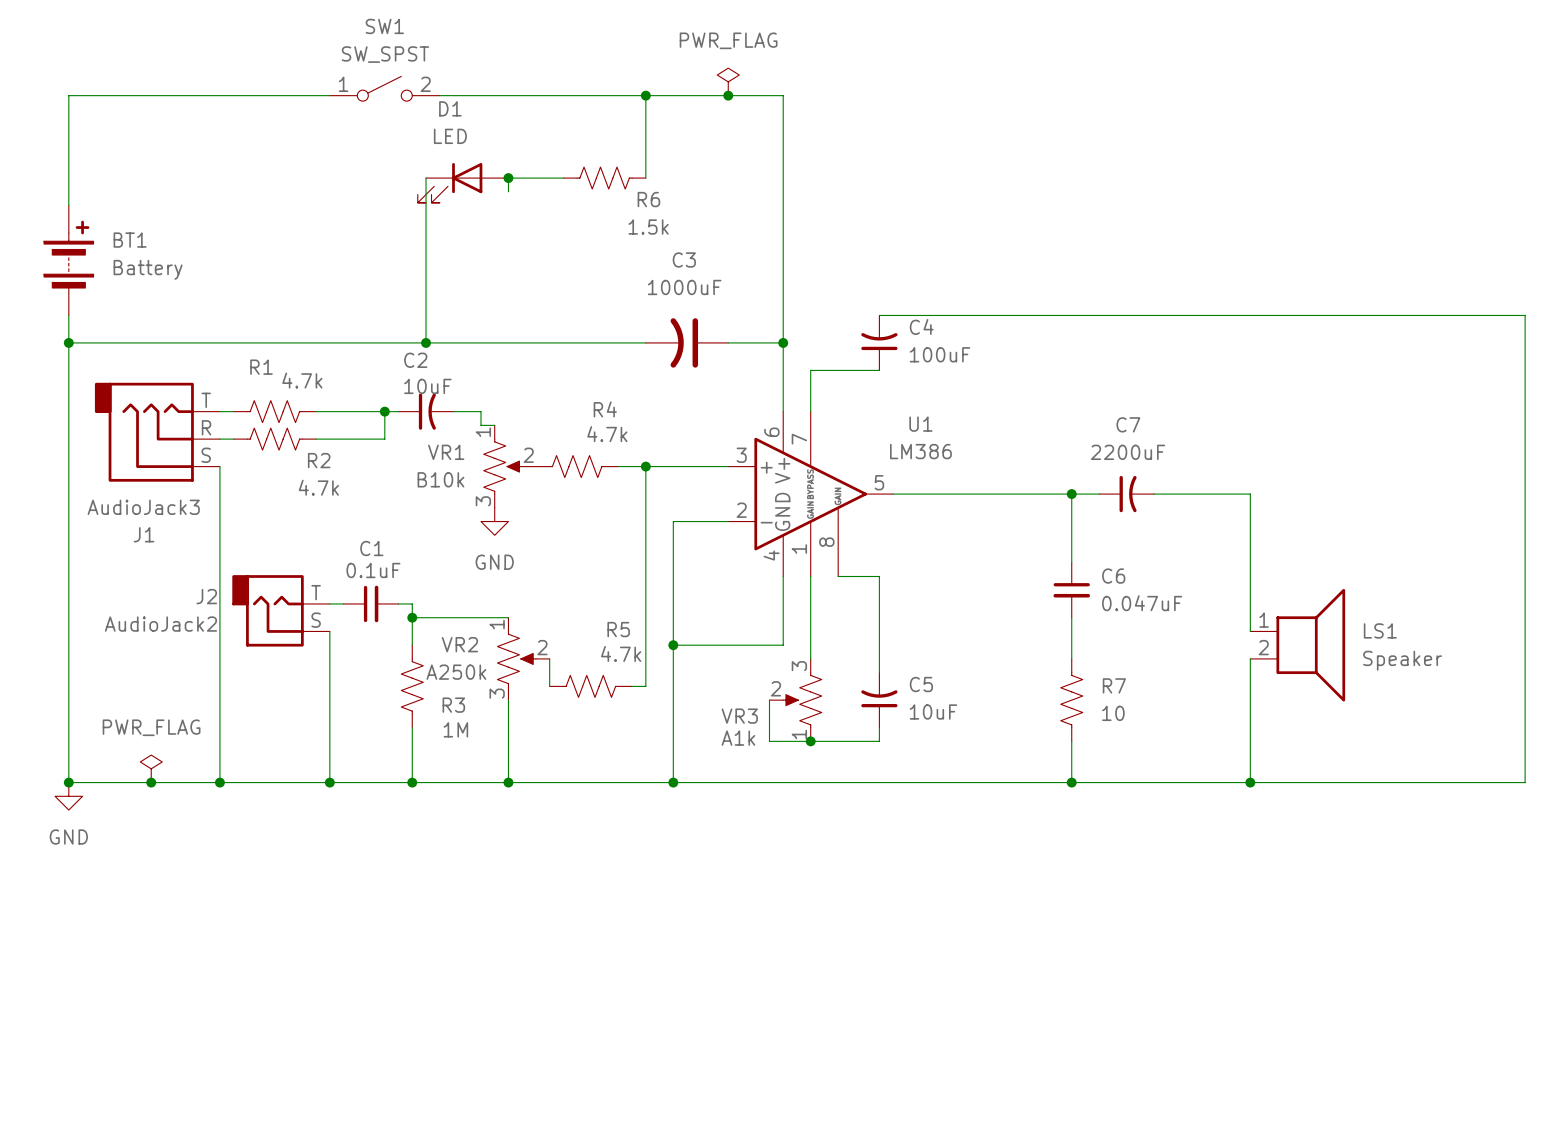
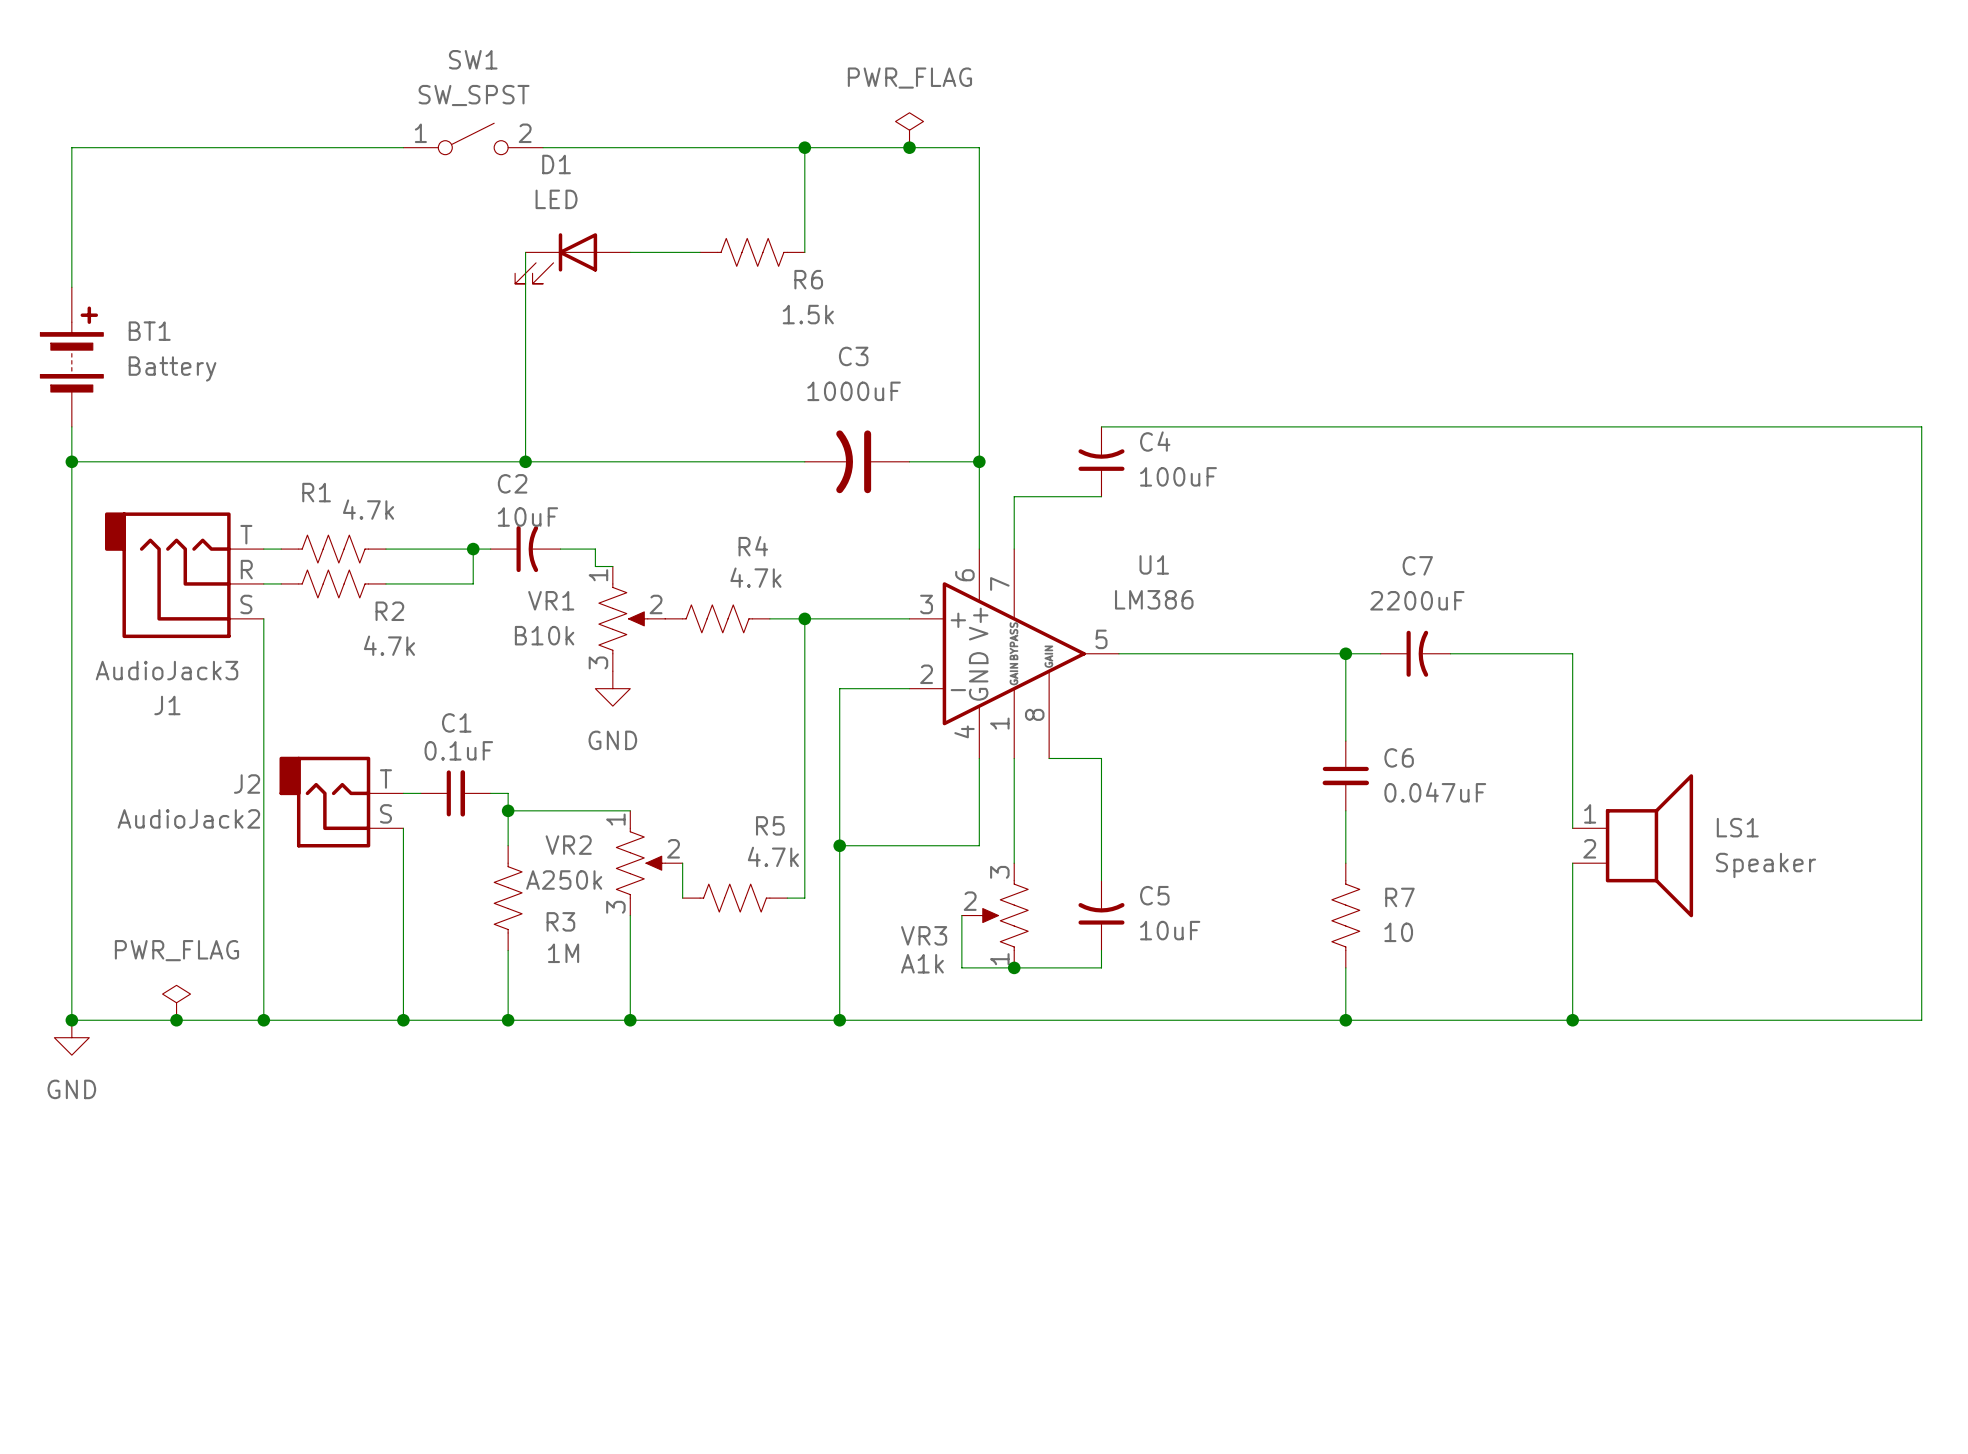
wire: (508, 178) (508, 191) -> none
junction: (508, 178) -> none

